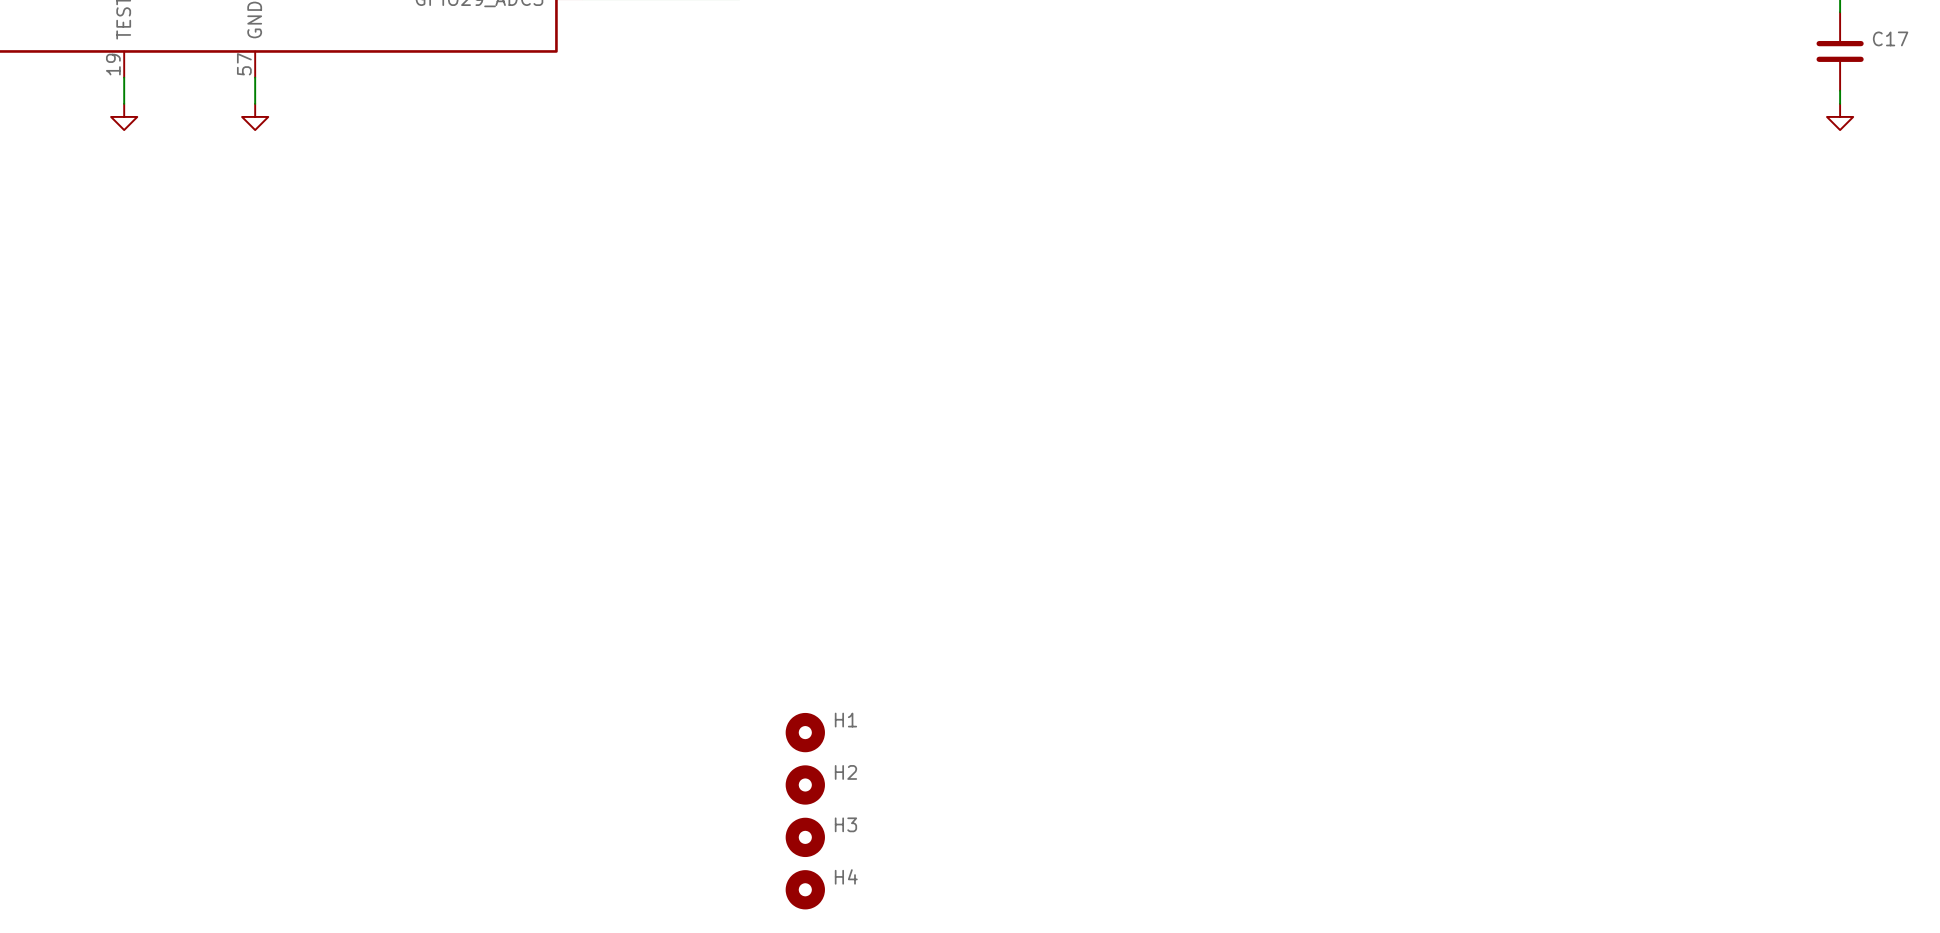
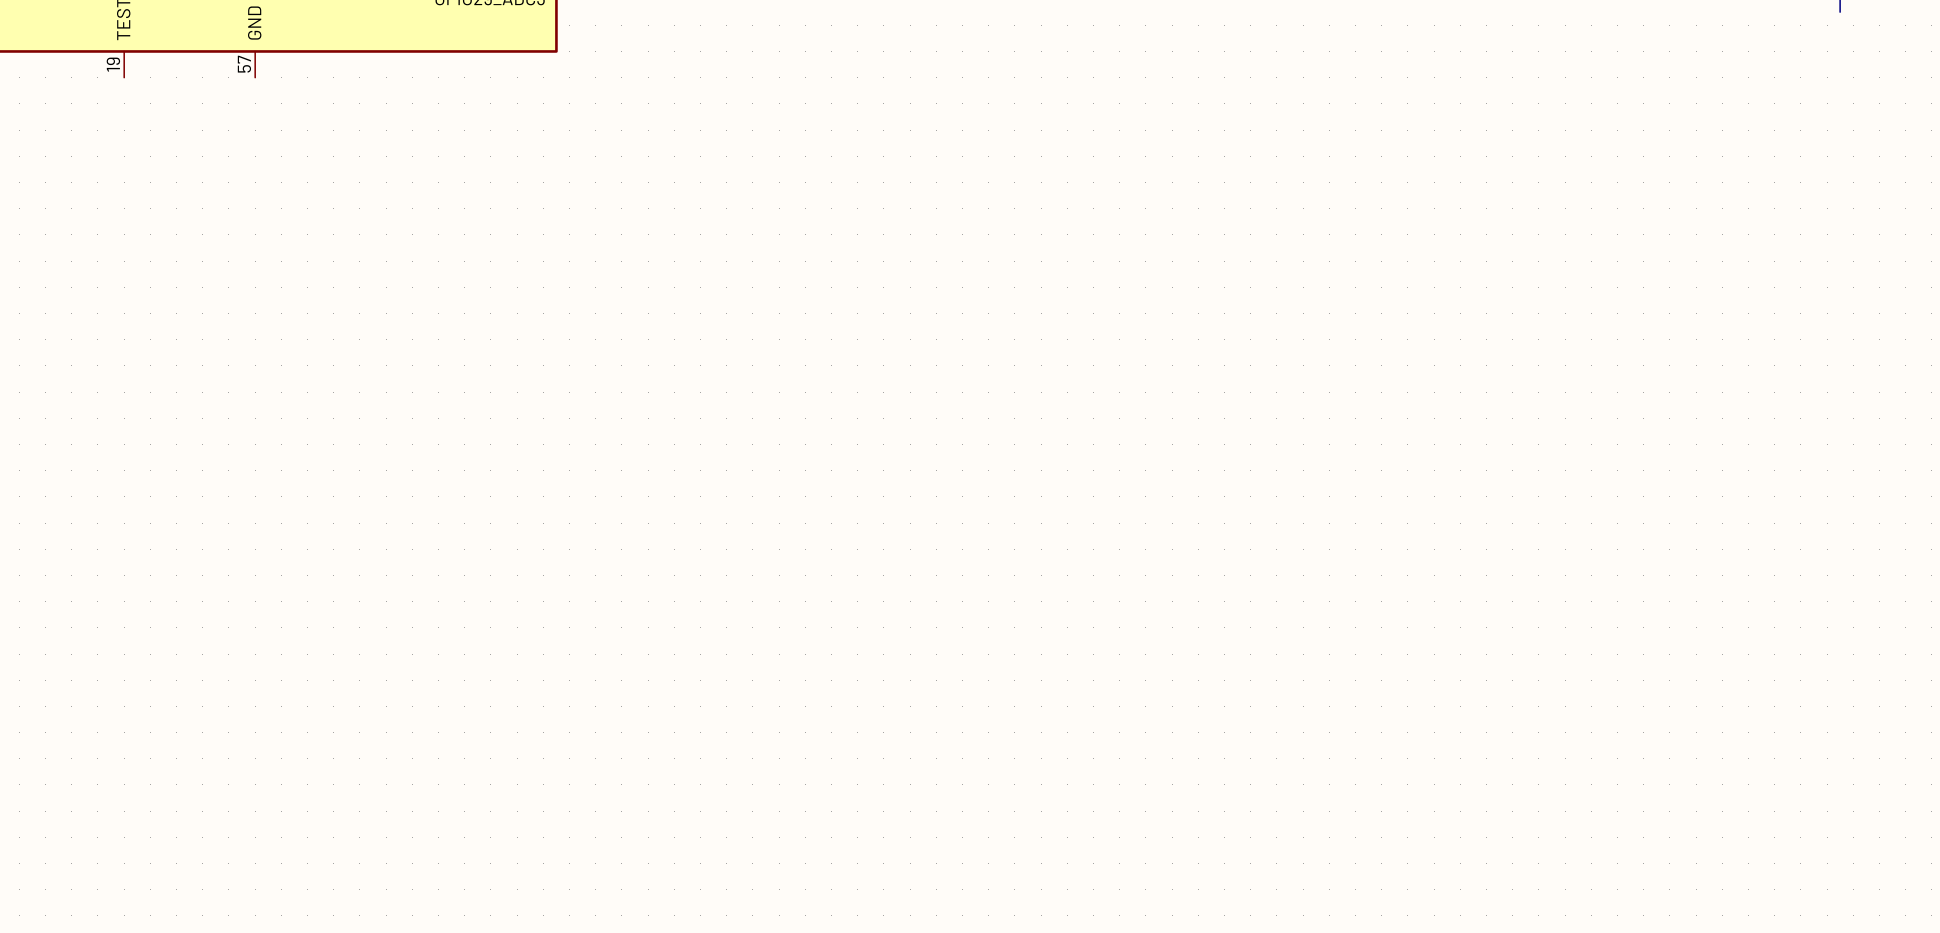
C17: (1840, 51) -> none
wire: (124, 77) (124, 103) -> none
wire: (255, 77) (255, 103) -> none
wire: (1840, 90) (1840, 103) -> none
power symbol: (124, 116) -> none
power symbol: (255, 116) -> none
power symbol: (1840, 116) -> none
H1: (805, 732) -> none
H2: (805, 784) -> none
H3: (805, 837) -> none
H4: (805, 889) -> none

